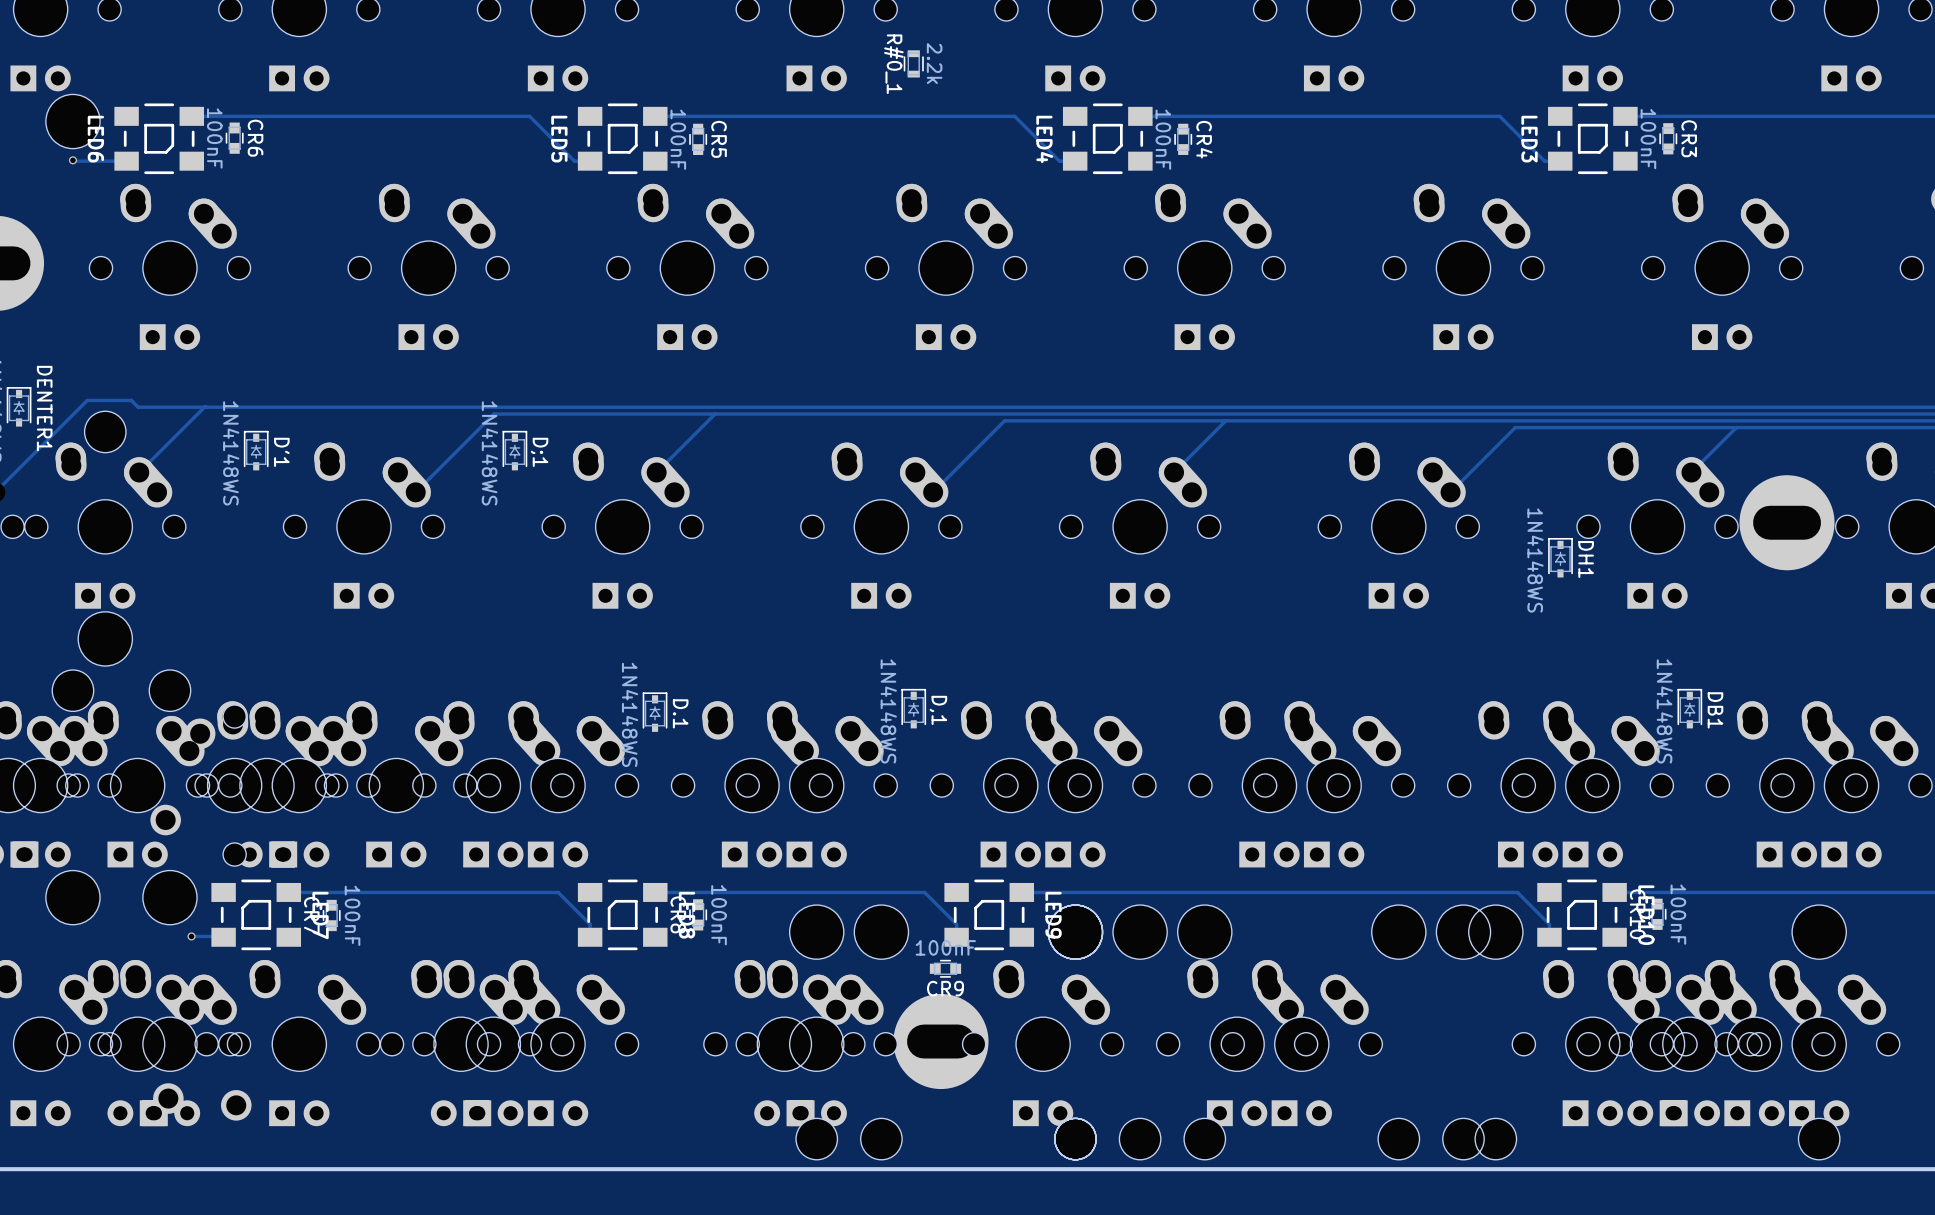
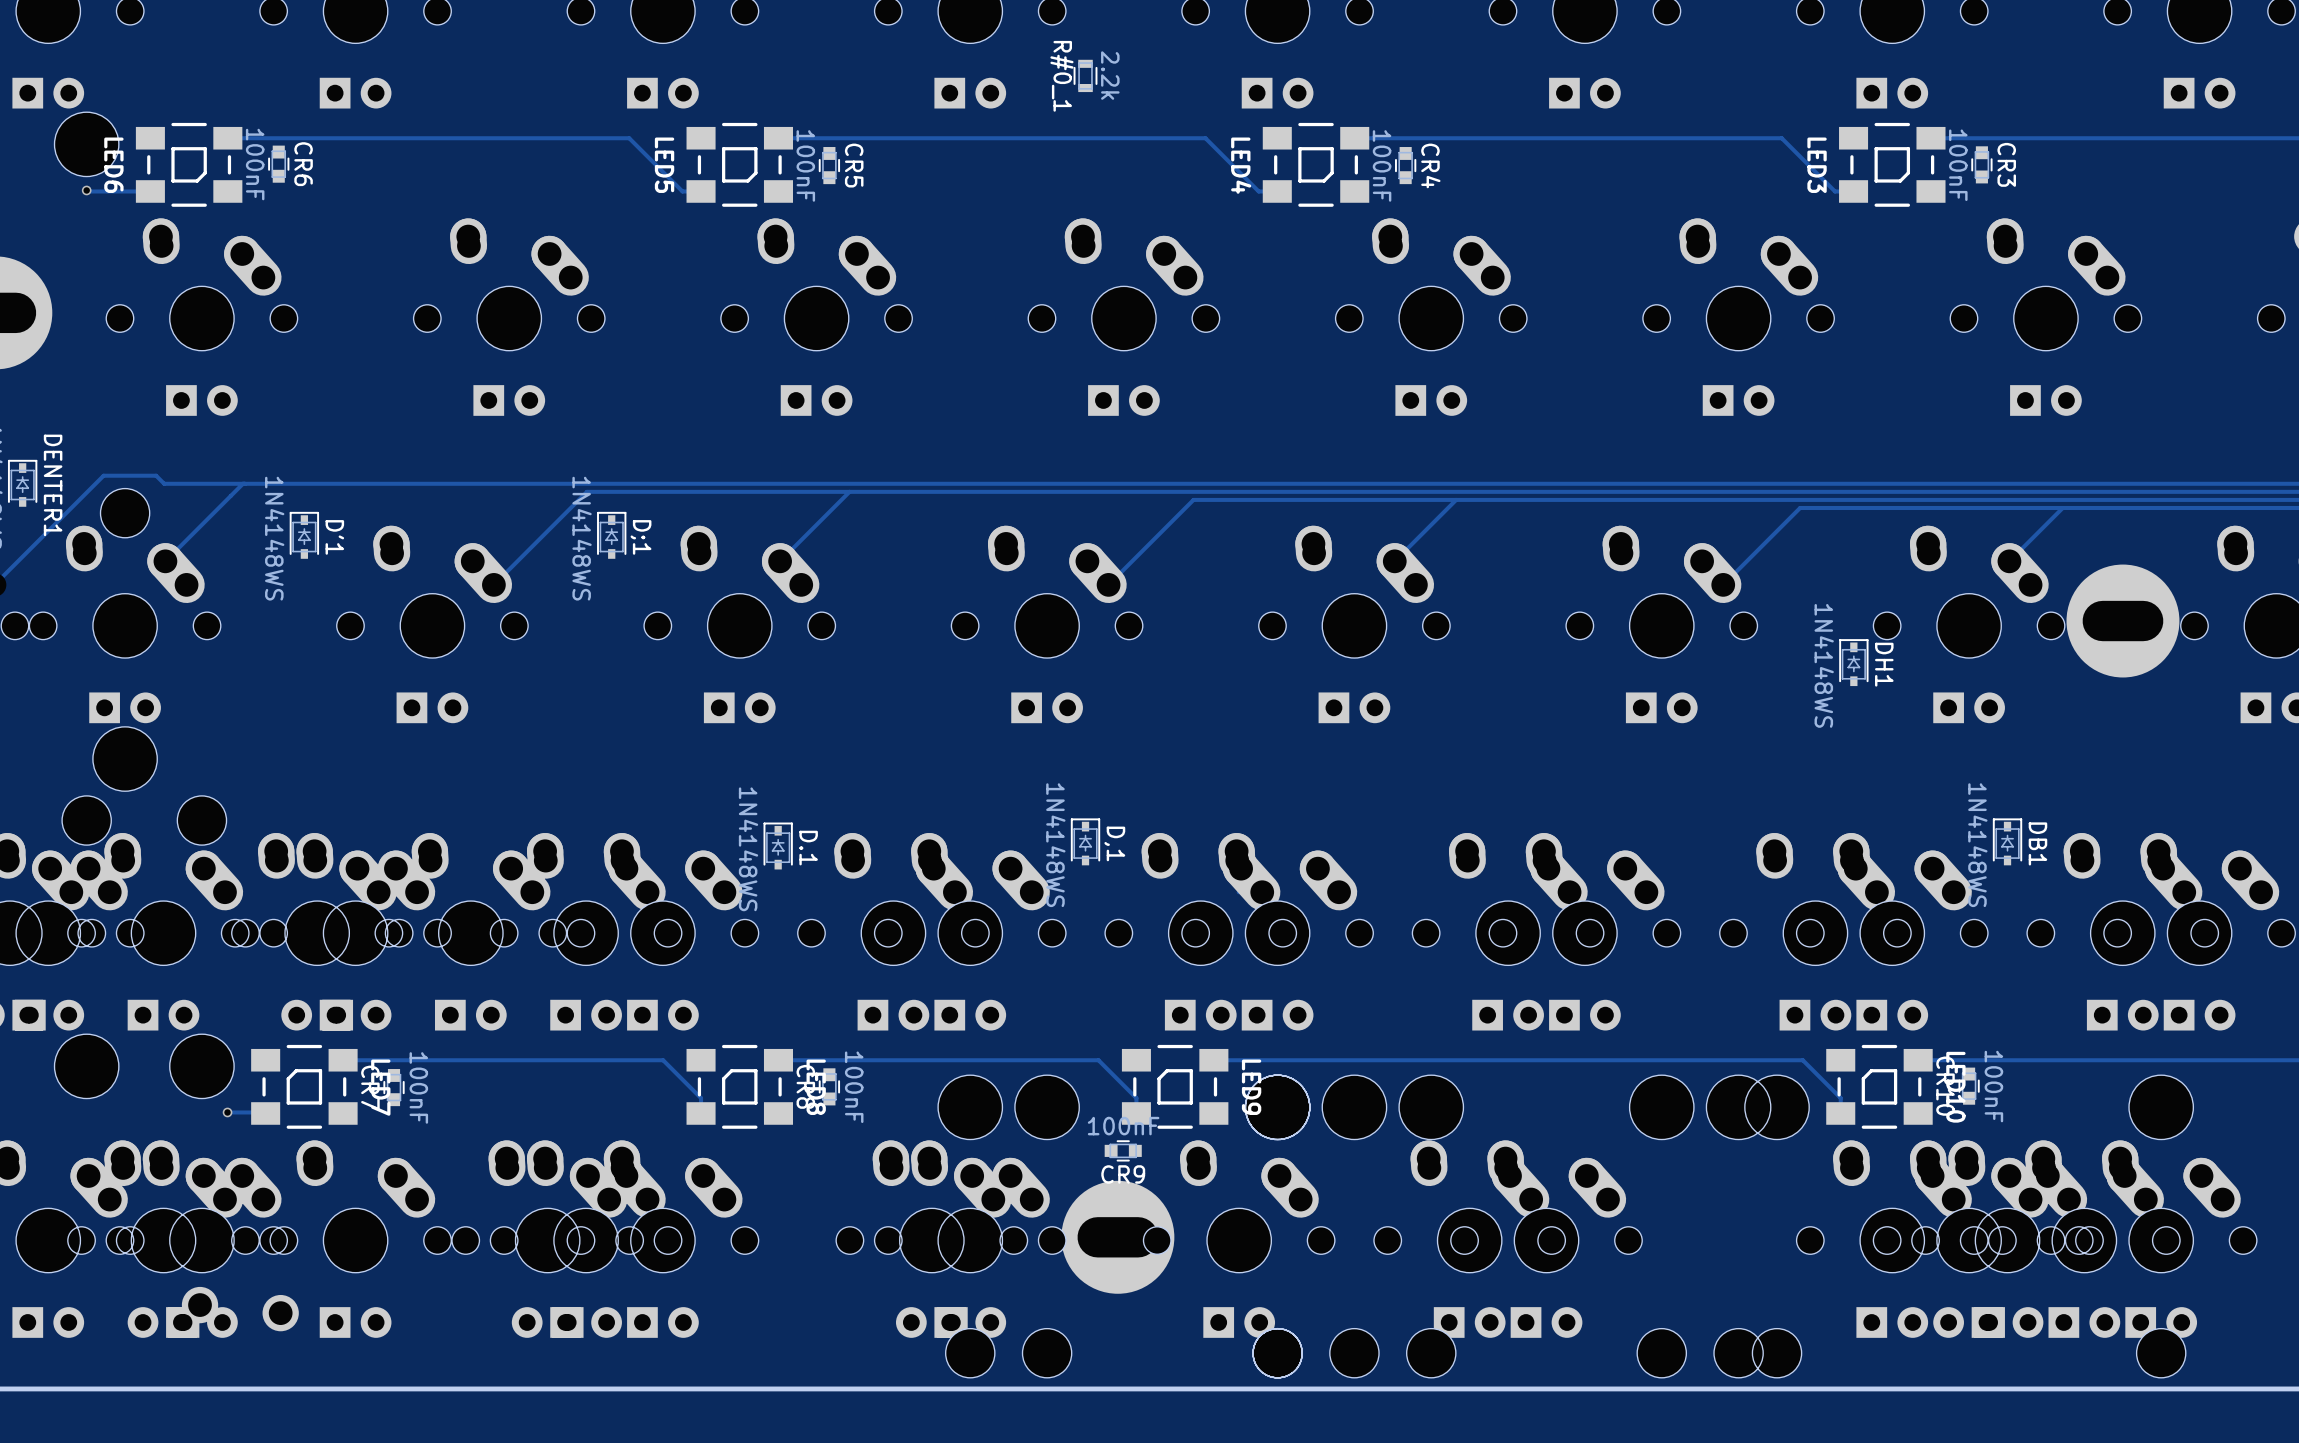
part: (206, 785) -> none

